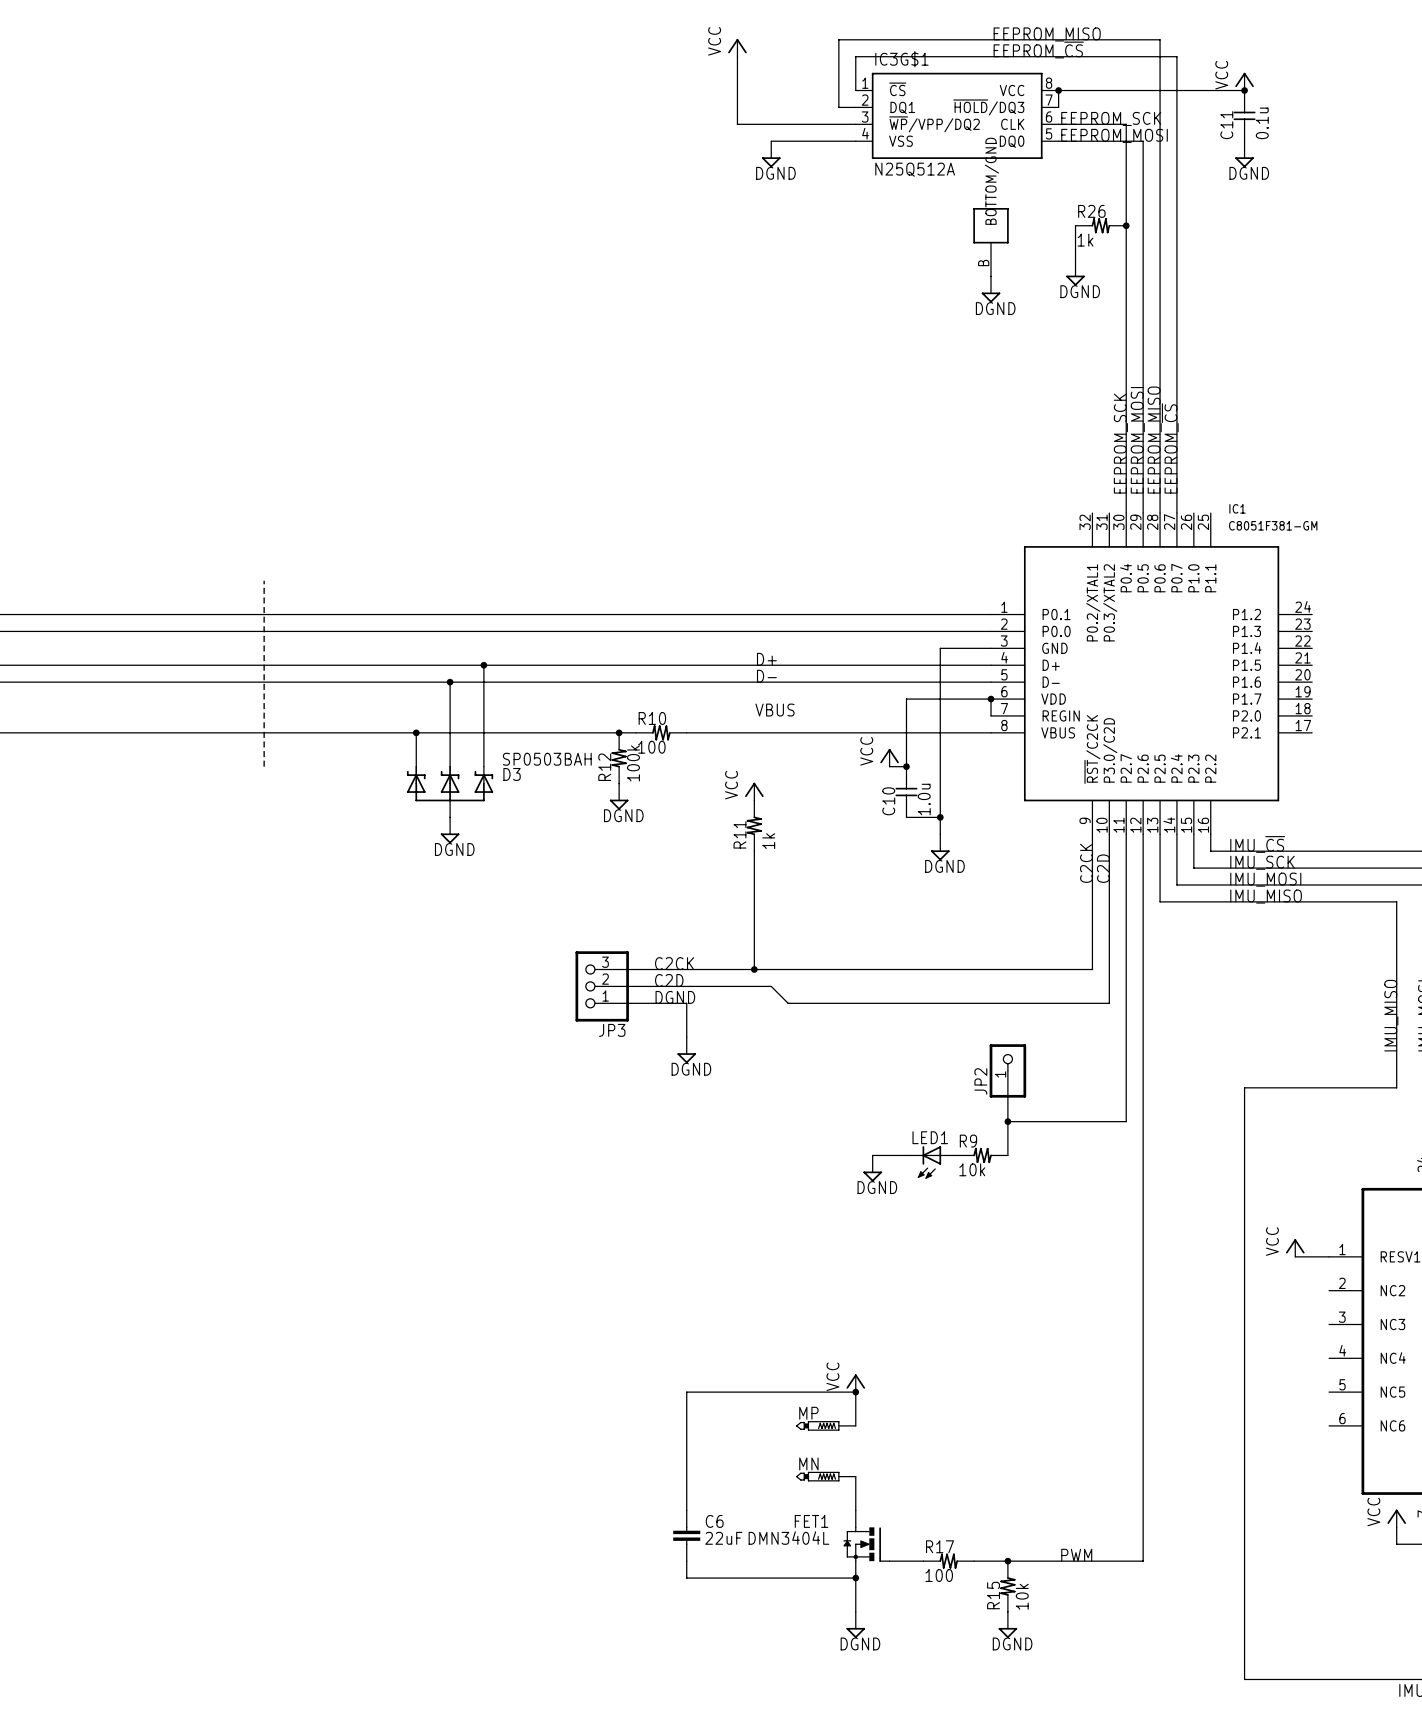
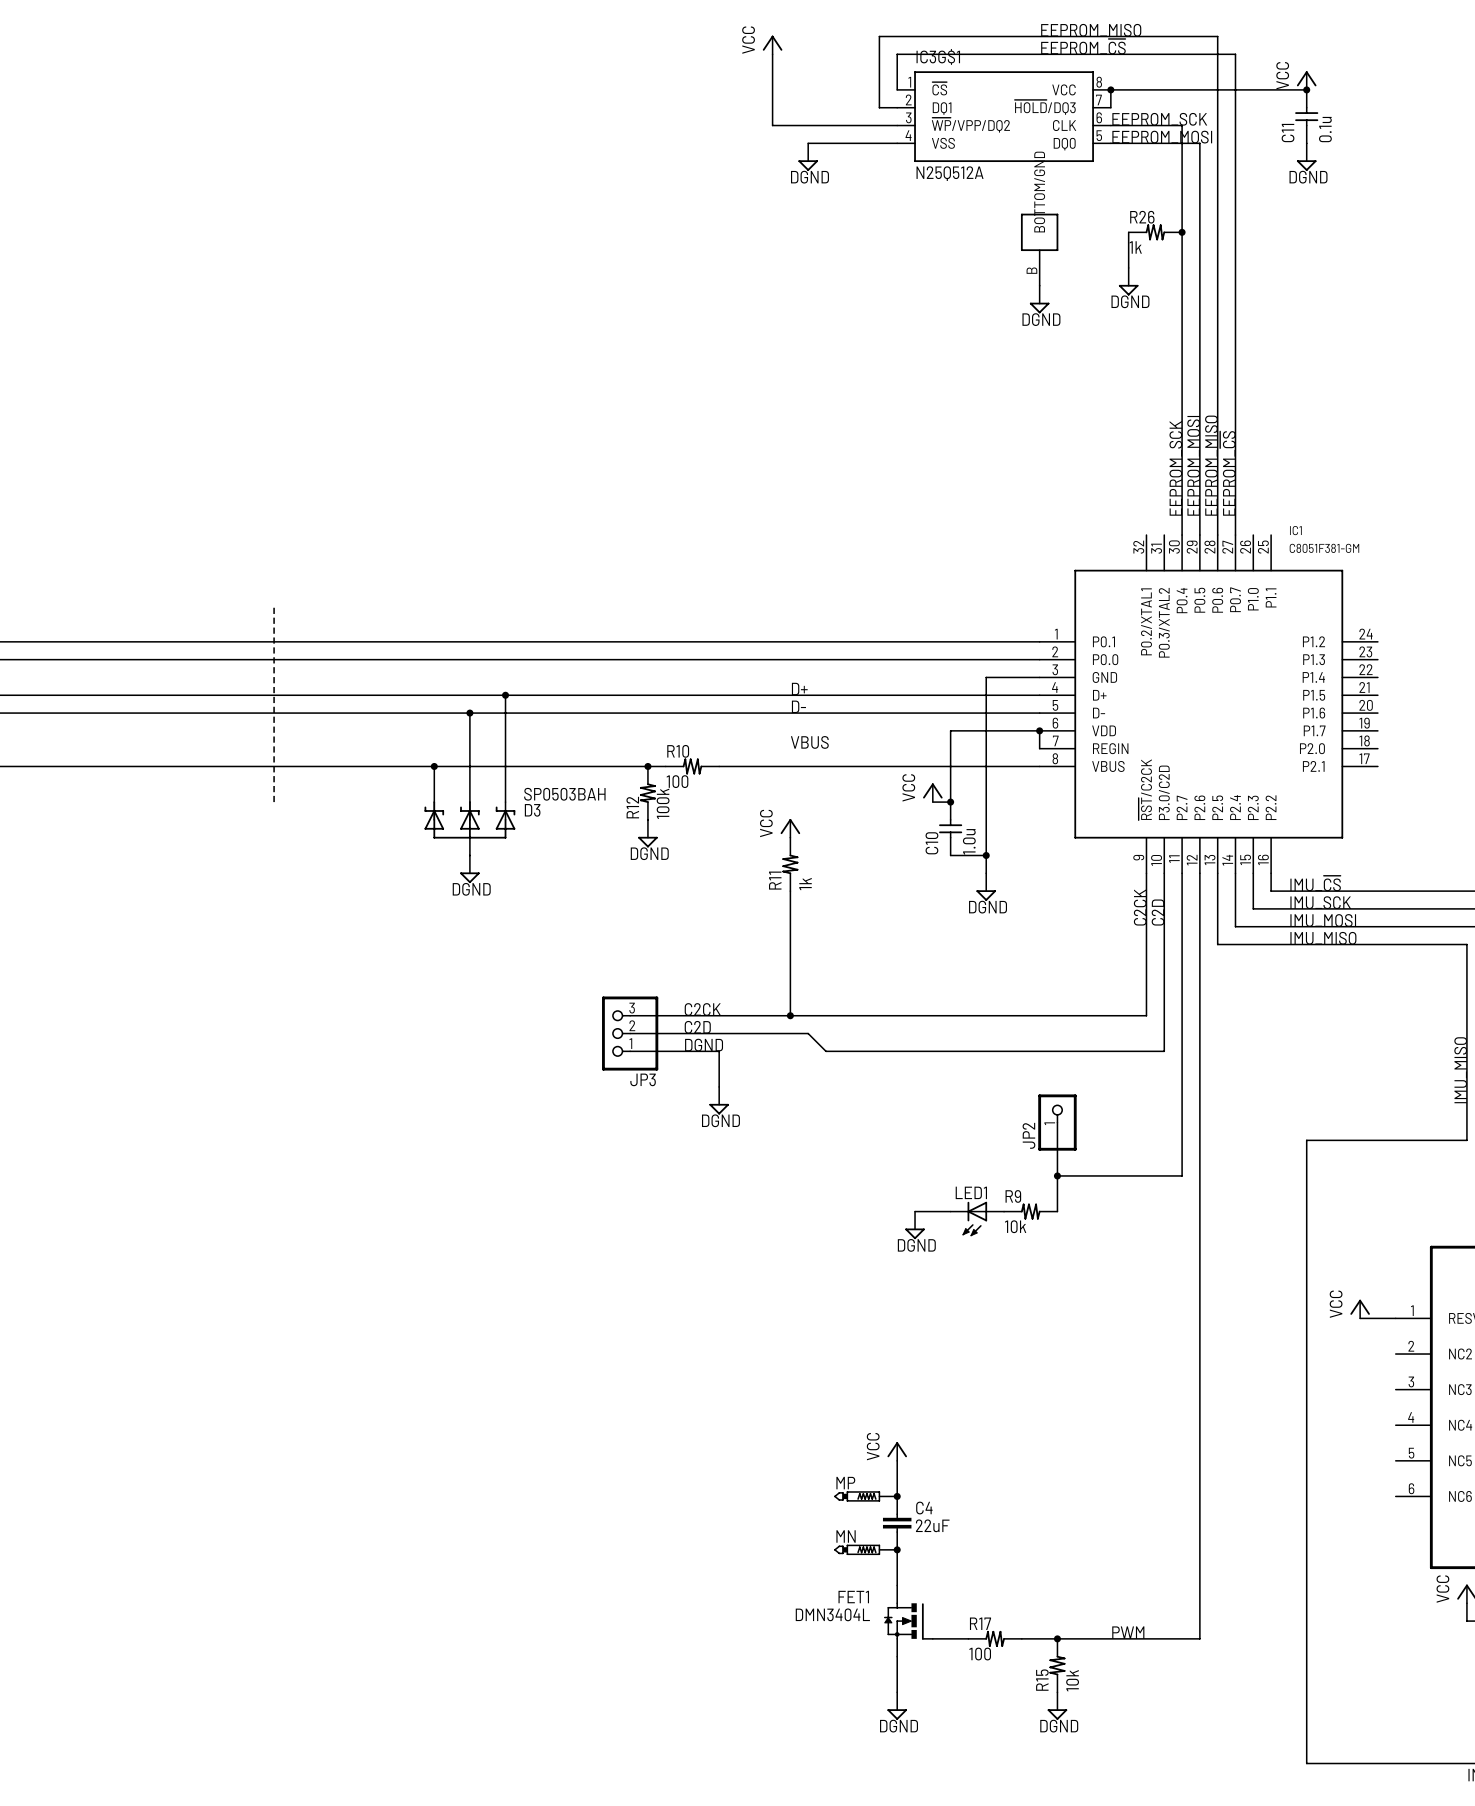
wire: (855, 1392) (686, 1392) (686, 1510) -> none
junction position: (855, 1392) -> (897, 1496)
C4: none -> 22uF (897, 1523)
junction: none -> (897, 1549)
C6: 22uF (686, 1535) -> none
wire: (686, 1561) (686, 1578) (855, 1578) -> none
junction: (855, 1578) -> none

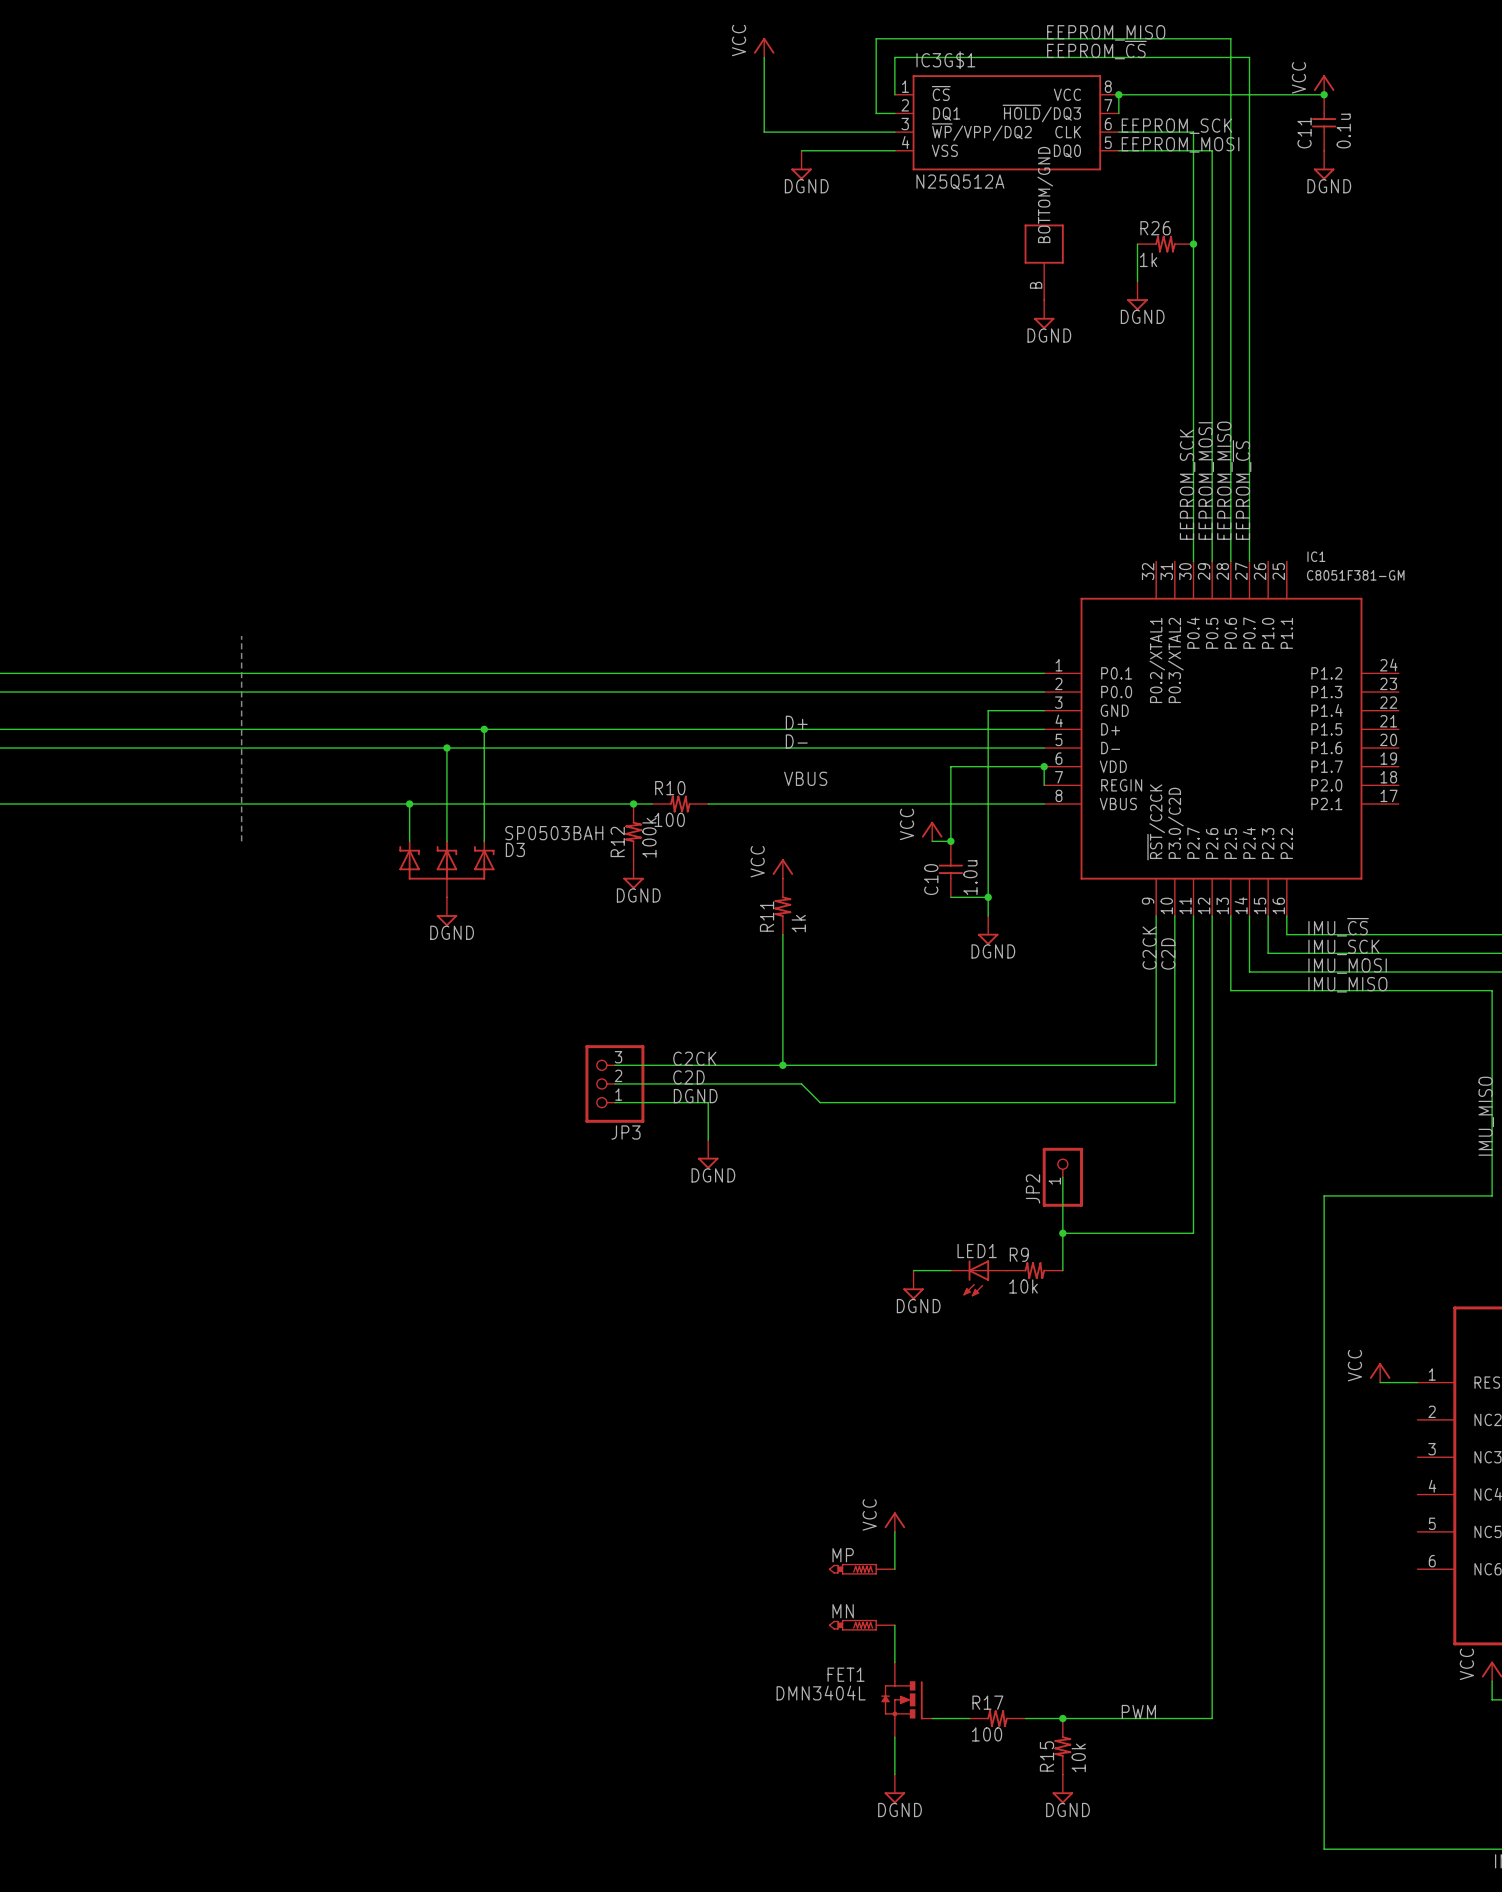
junction: (897, 1496) -> none
C4: 22uF (897, 1523) -> none
junction: (897, 1549) -> none

